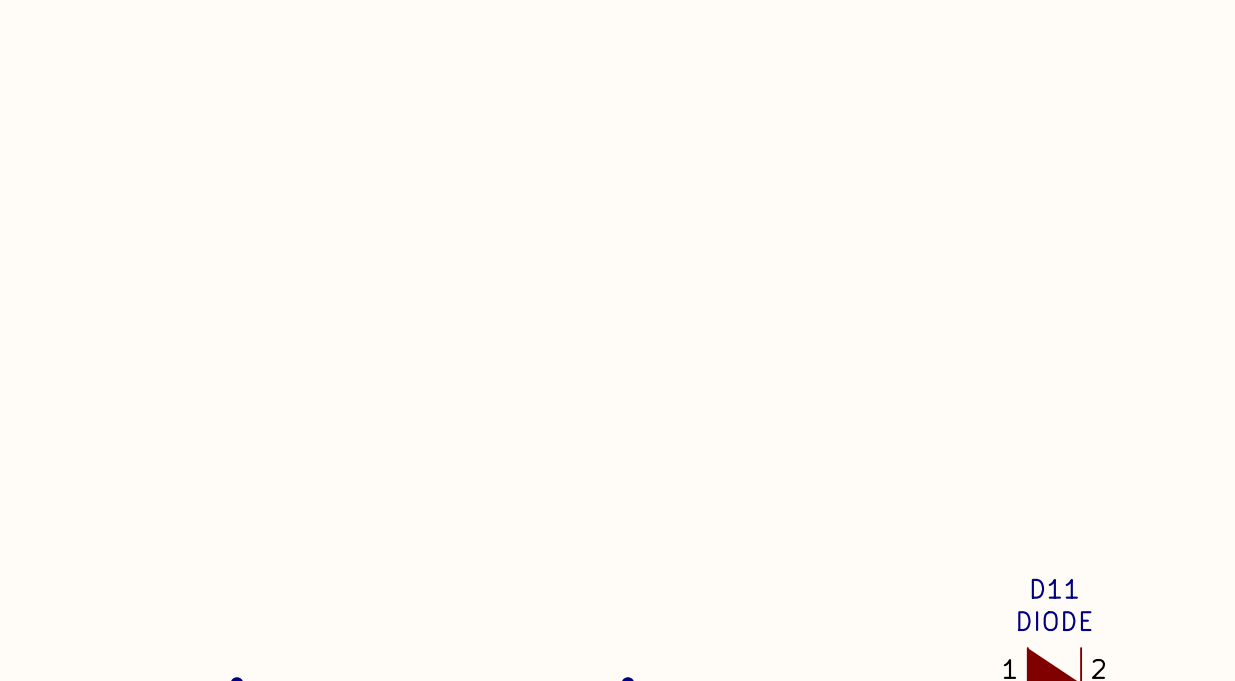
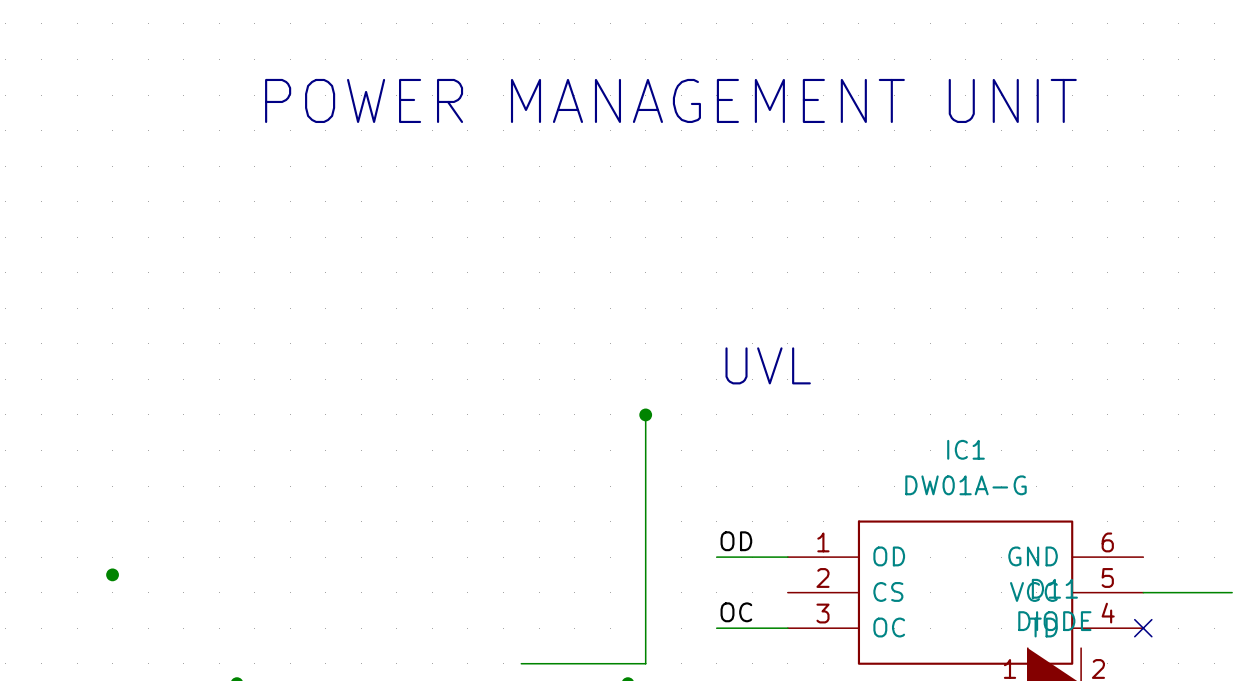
text: none -> POWER MANAGEMENT UNIT (670, 100)
text: none -> UVL (768, 365)
wire: none -> (645, 414) (645, 663) (521, 663)
junction: none -> (645, 414)
label: none -> OD (736, 541)
wire: none -> (716, 557) (787, 557)
junction: none -> (112, 574)
IC1: none -> DW01A-G (965, 592)
wire: none -> (1143, 592) (1232, 592)
label: none -> OC (736, 612)
wire: none -> (716, 628) (787, 628)
no-connect mark: none -> (1143, 628)

